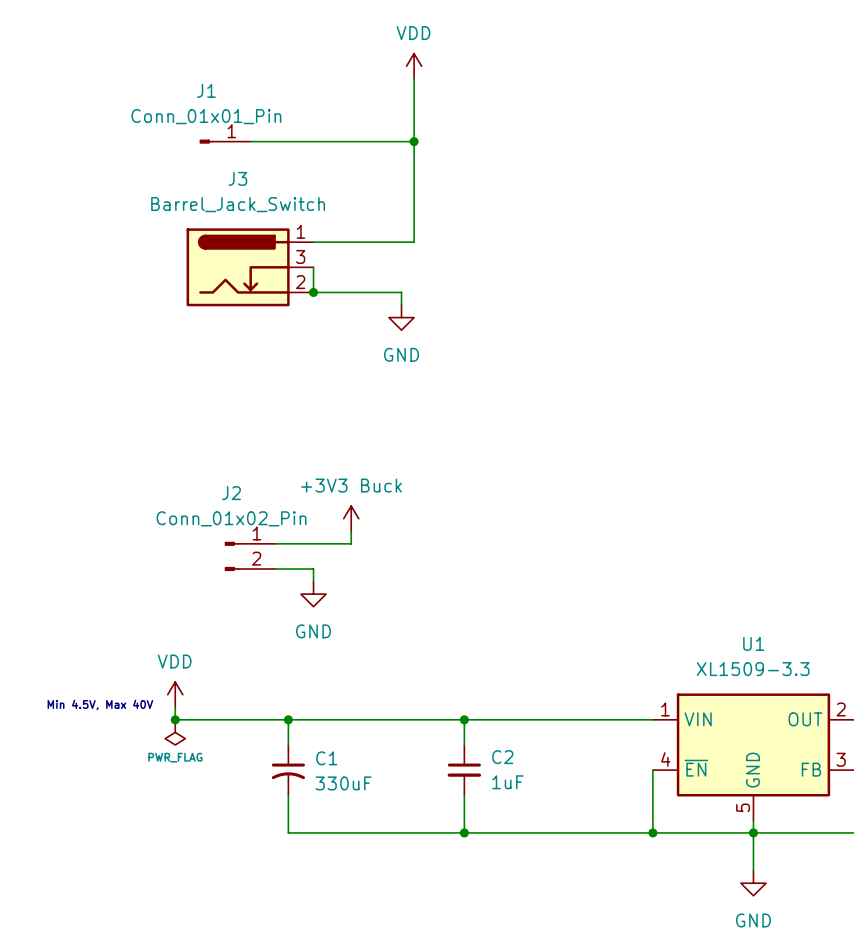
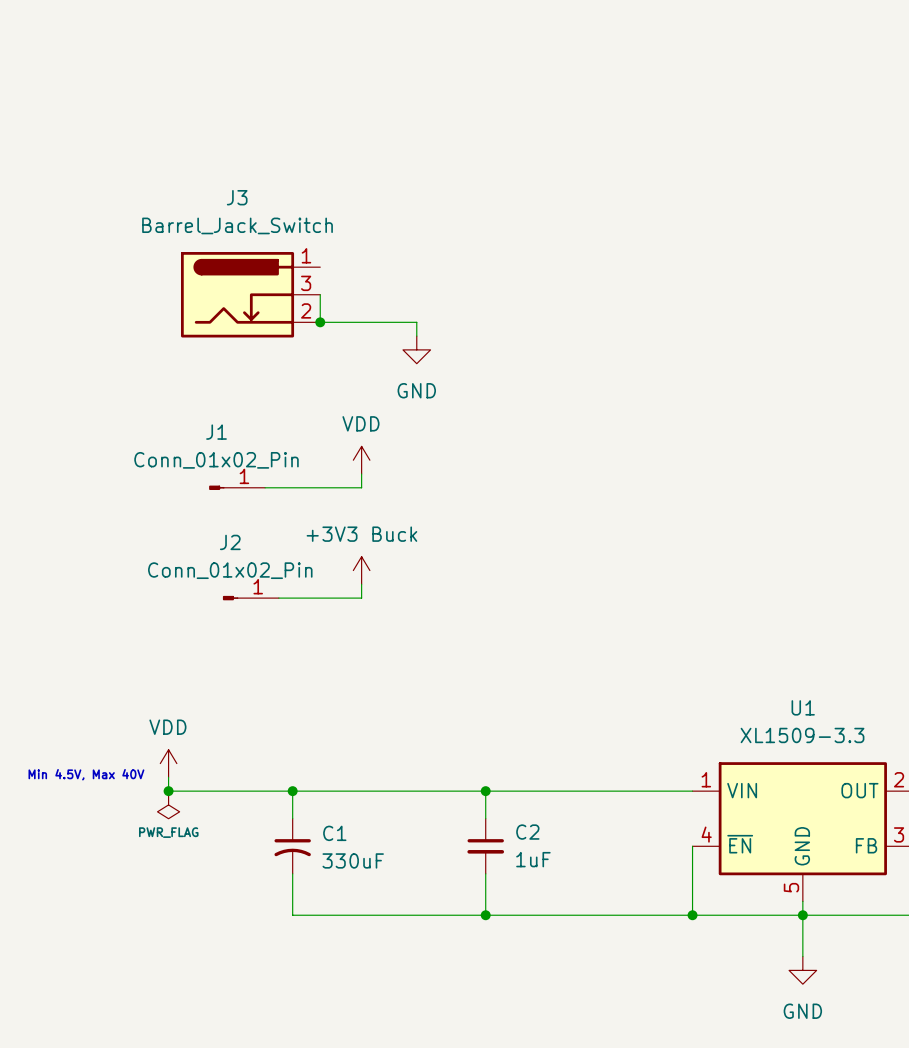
power symbol: VDD (414, 66) -> none
wire: (414, 78) (414, 242) (313, 242) -> none
J1 value: Conn_01x01_Pin (206, 116) -> Conn_01x02_Pin (216, 460)
J1 position: (225, 141) -> (237, 487)
wire: (250, 141) (414, 141) -> none
junction: (414, 141) -> none
power symbol: none -> VDD (361, 460)
wire: none -> (361, 474) (361, 487) (265, 487)
J2 symbol: [224, 541, 276, 572] -> [222, 595, 279, 601]
wire: (275, 568) (313, 568) (313, 581) -> none
power symbol: GND (313, 594) -> none

